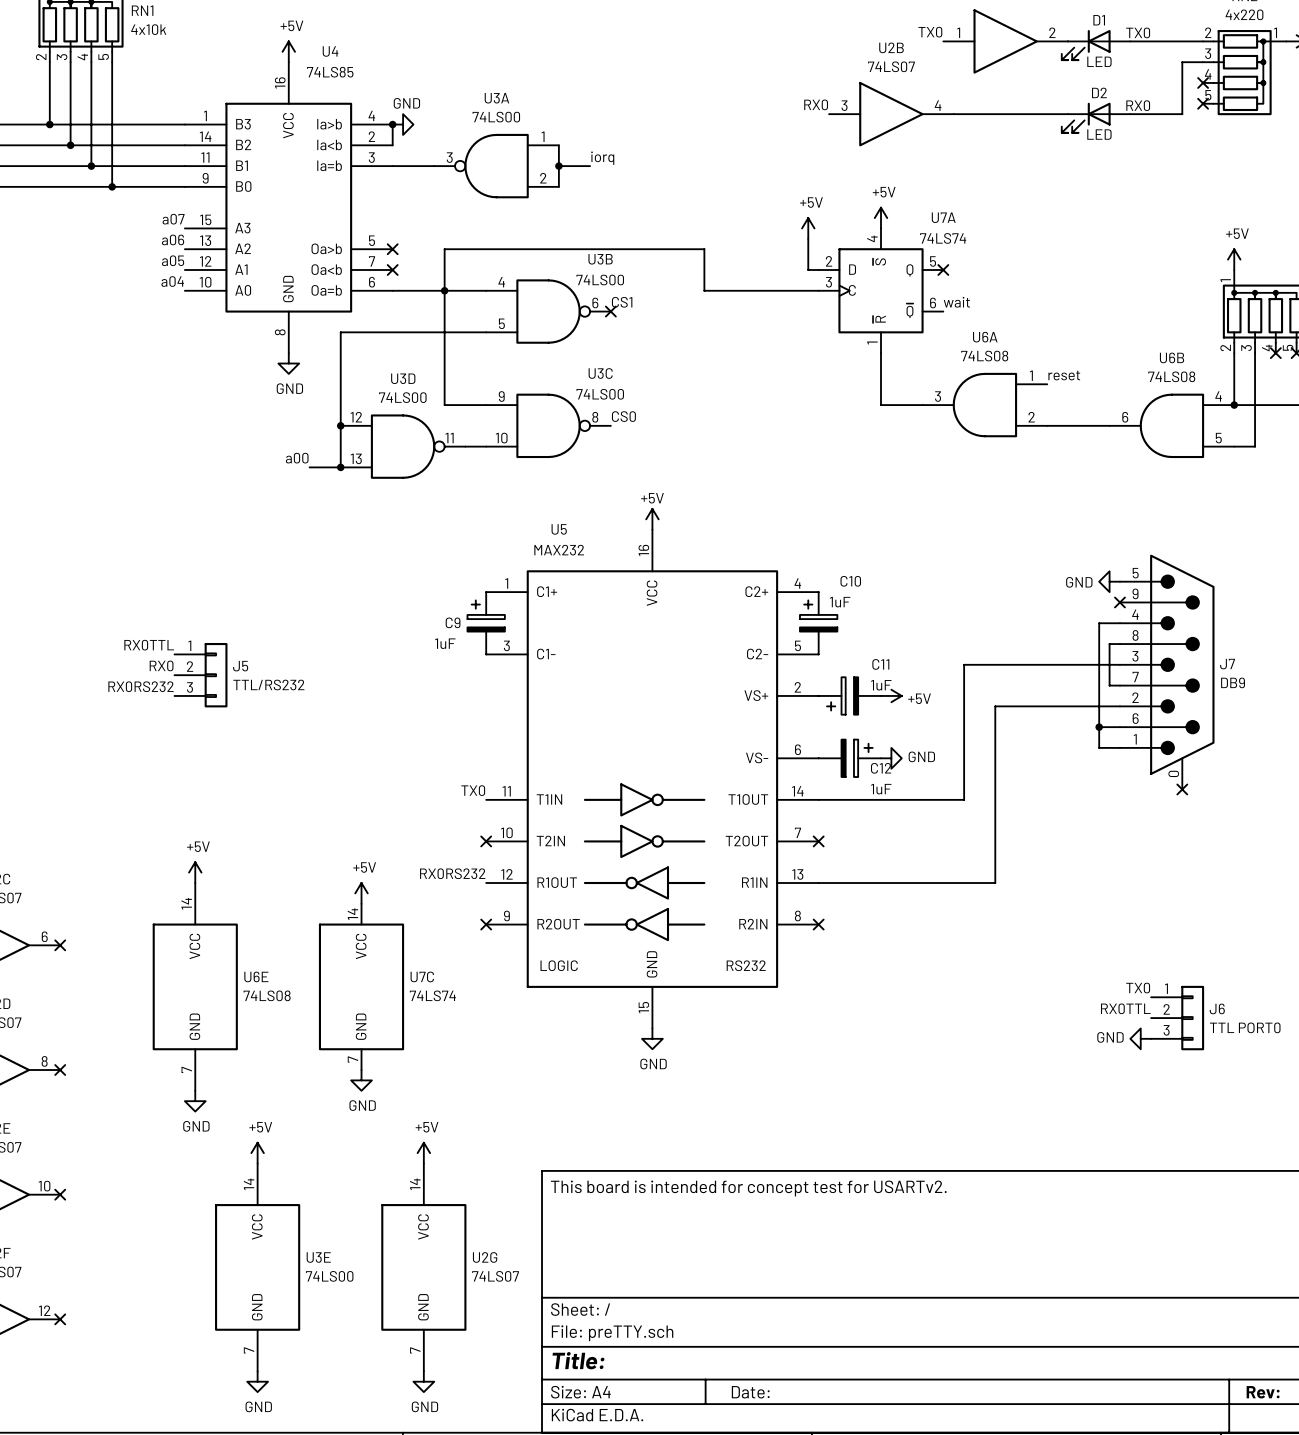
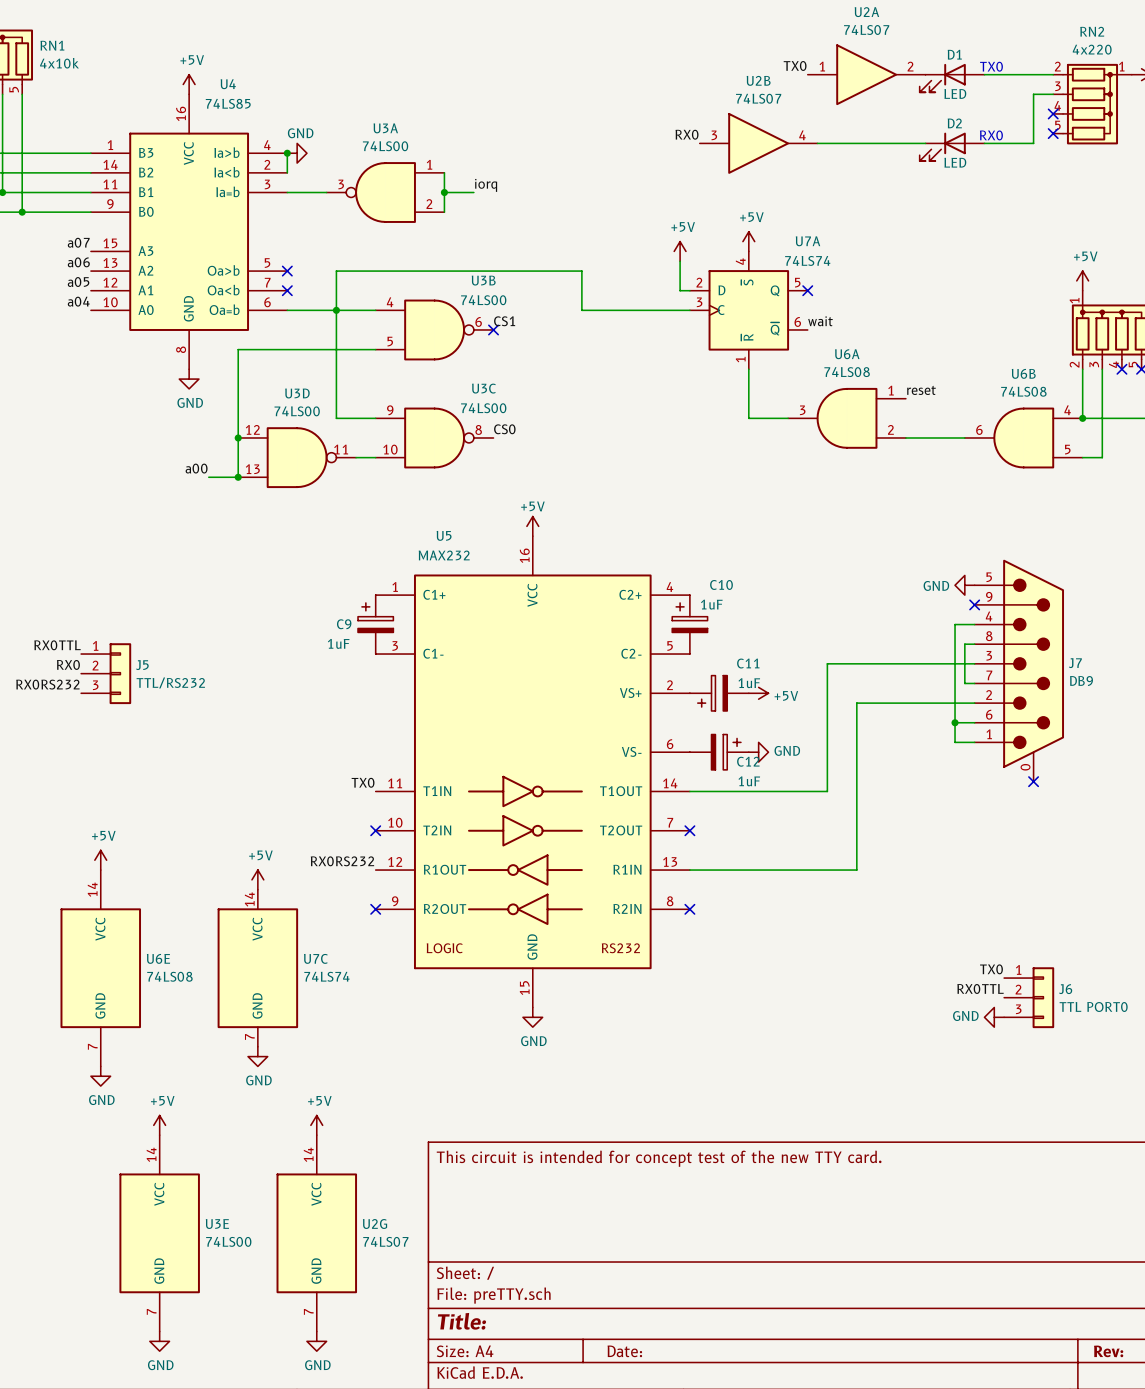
title block: This board is intended for concept test for USARTv2. (748, 1188) -> This circuit is intended for concept test of the new TTY card. (659, 1158)

